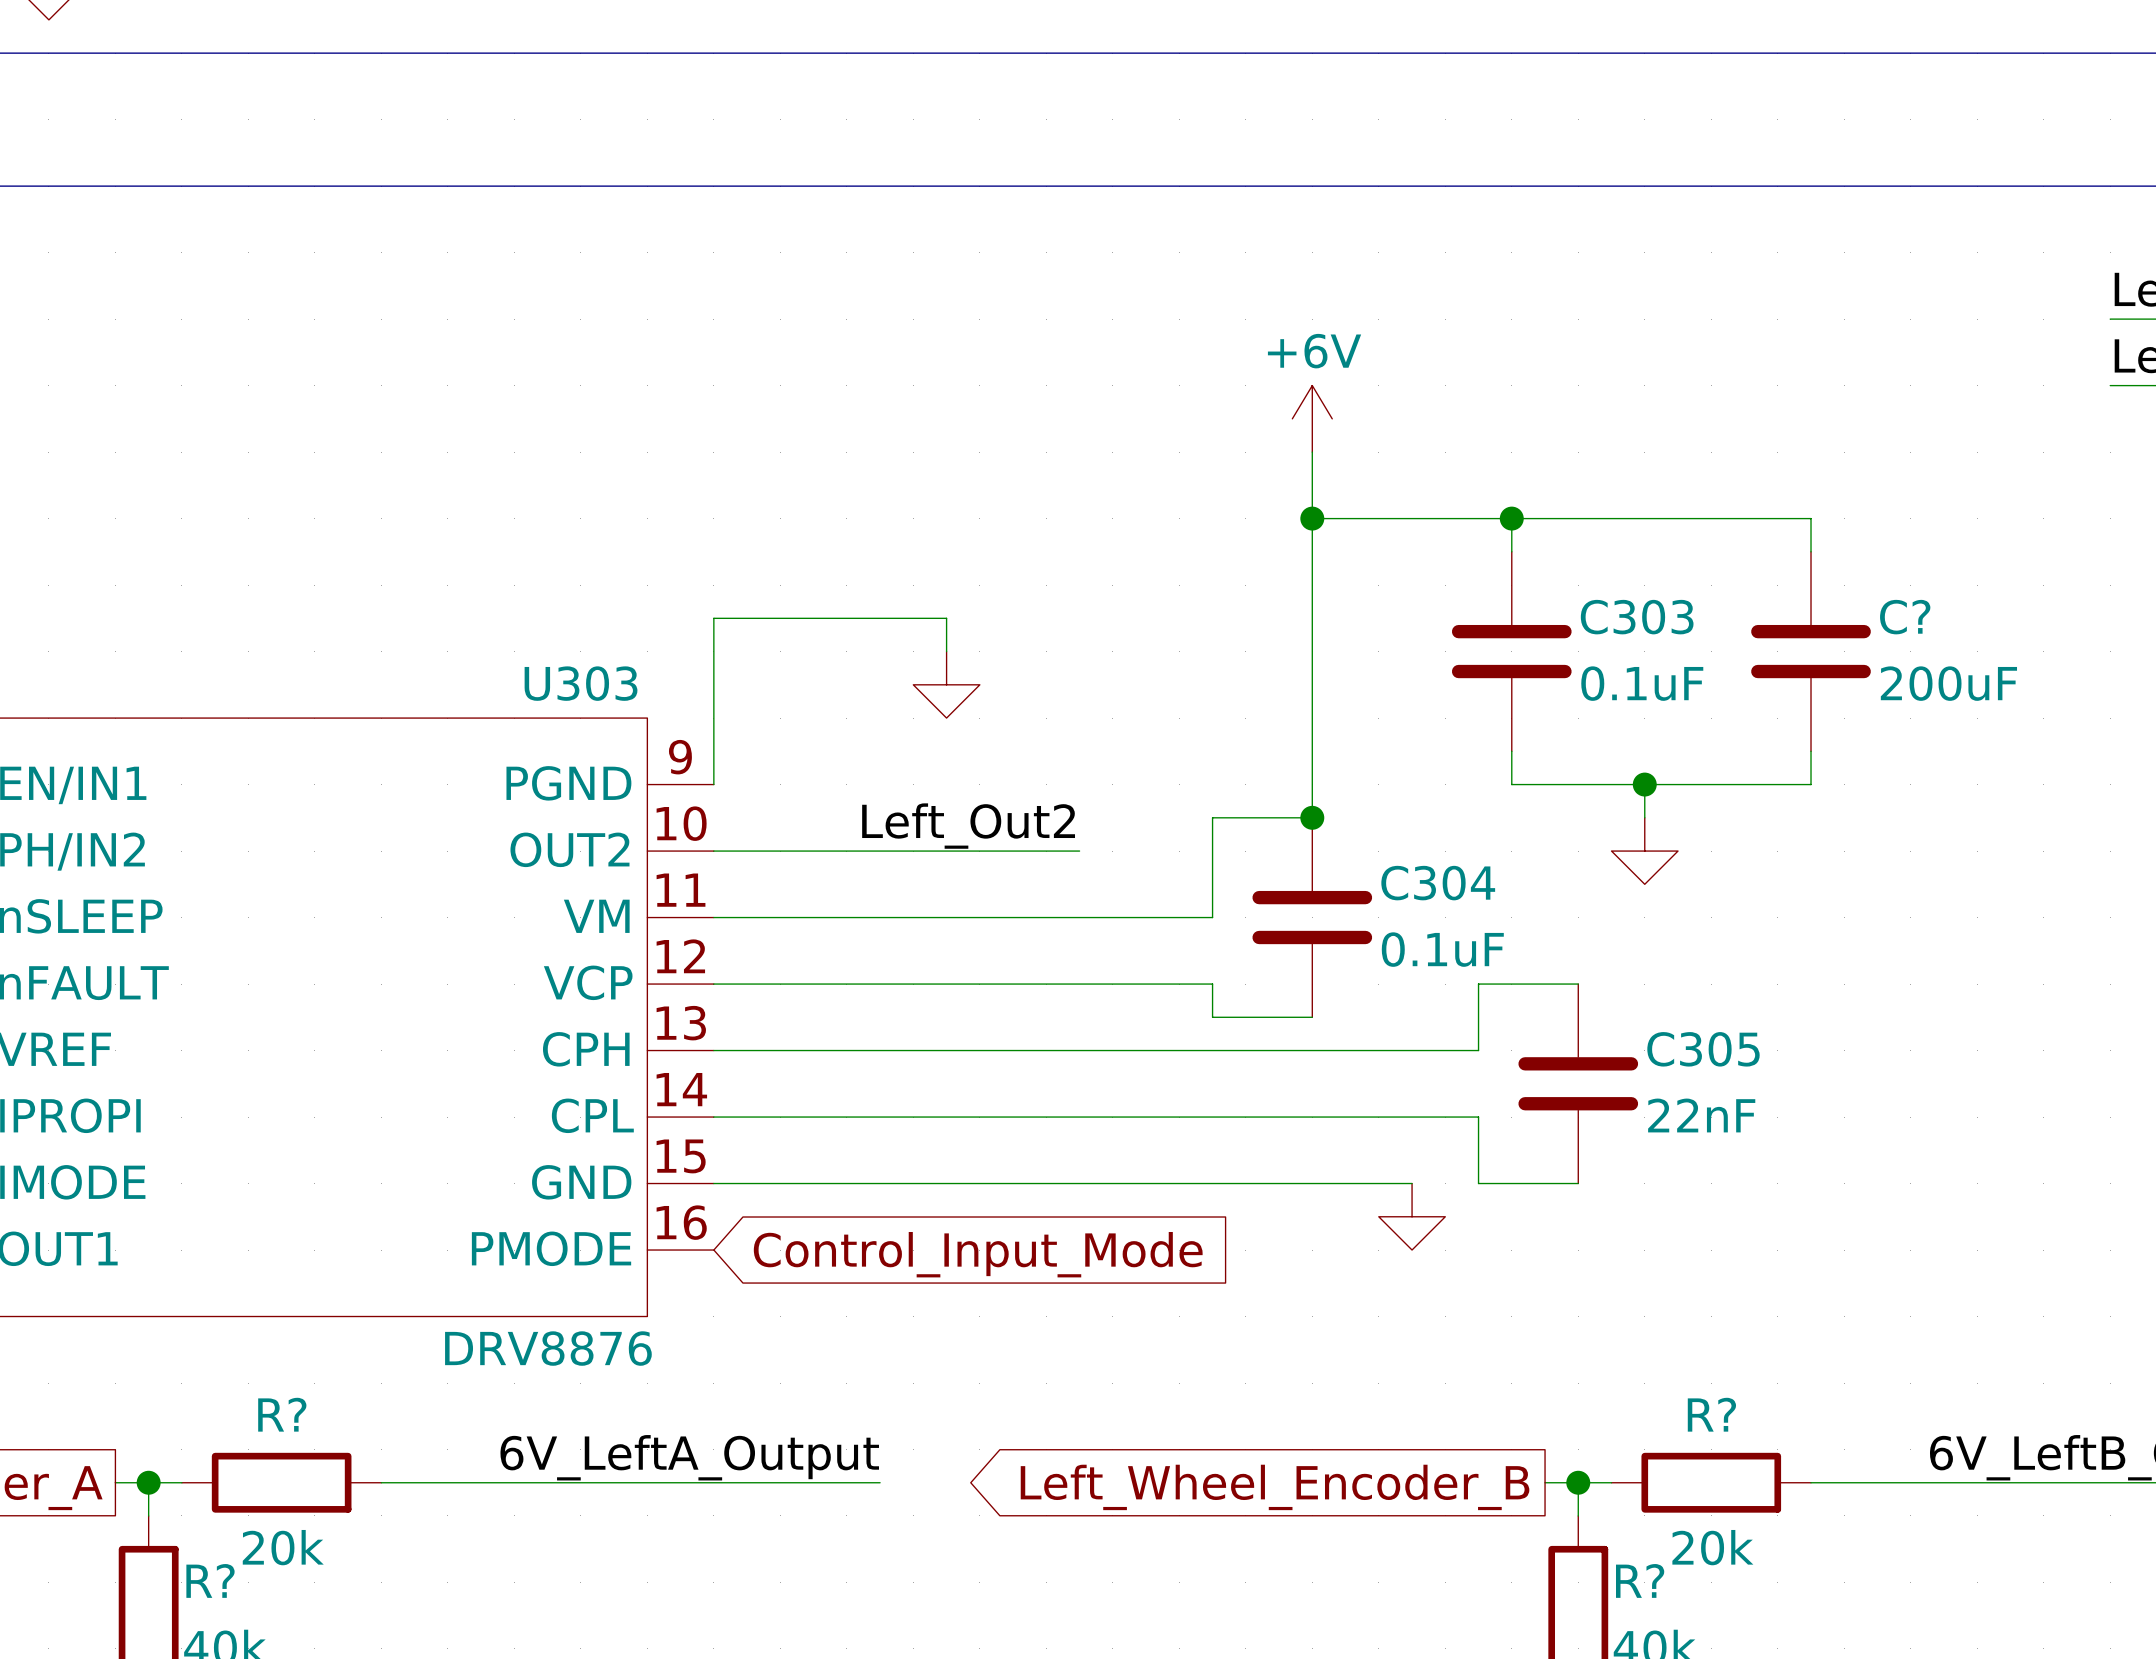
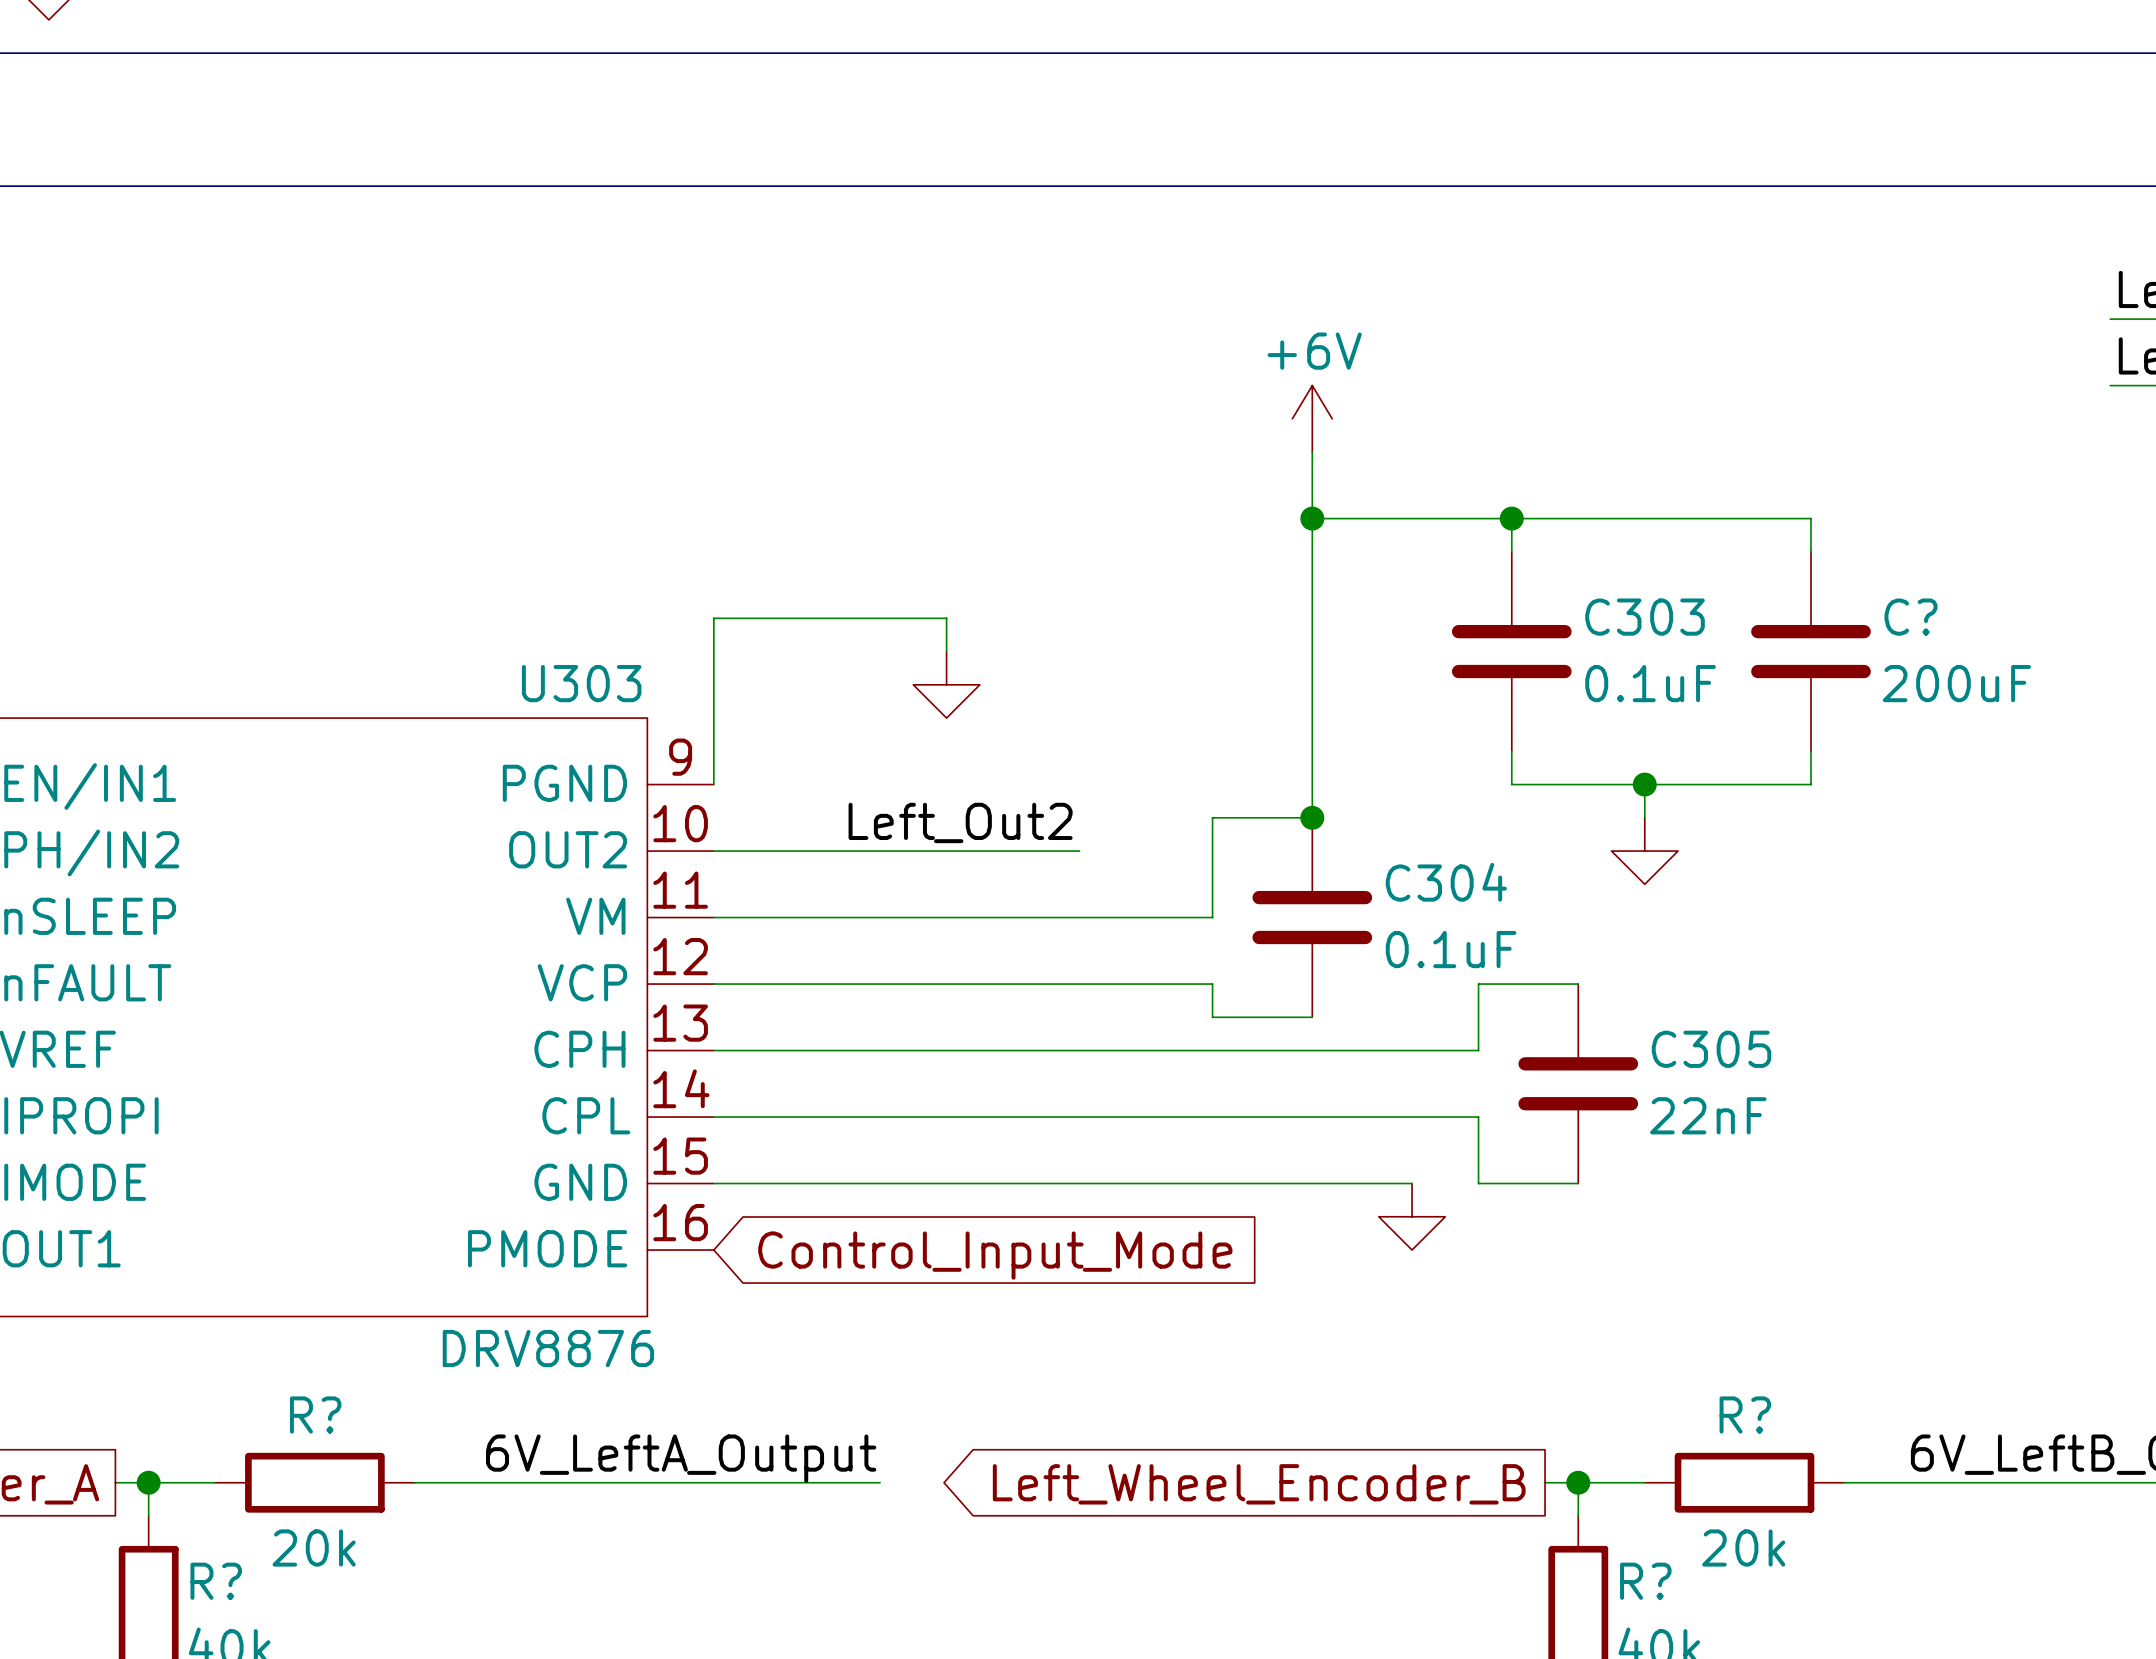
R? position: (281, 1482) -> (314, 1482)
R? position: (1711, 1482) -> (1744, 1482)

